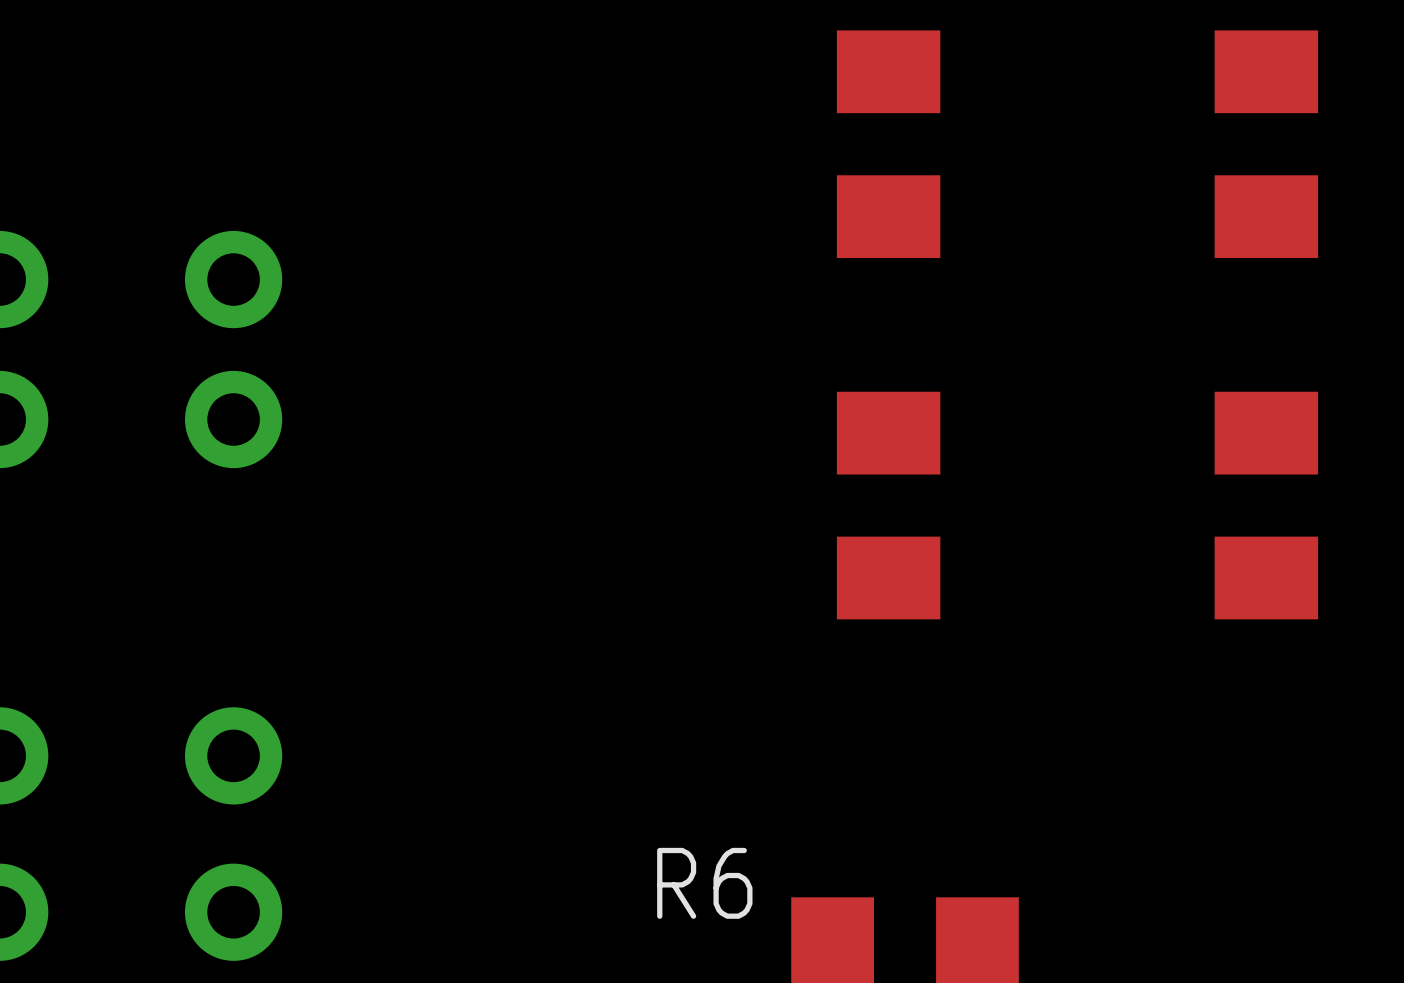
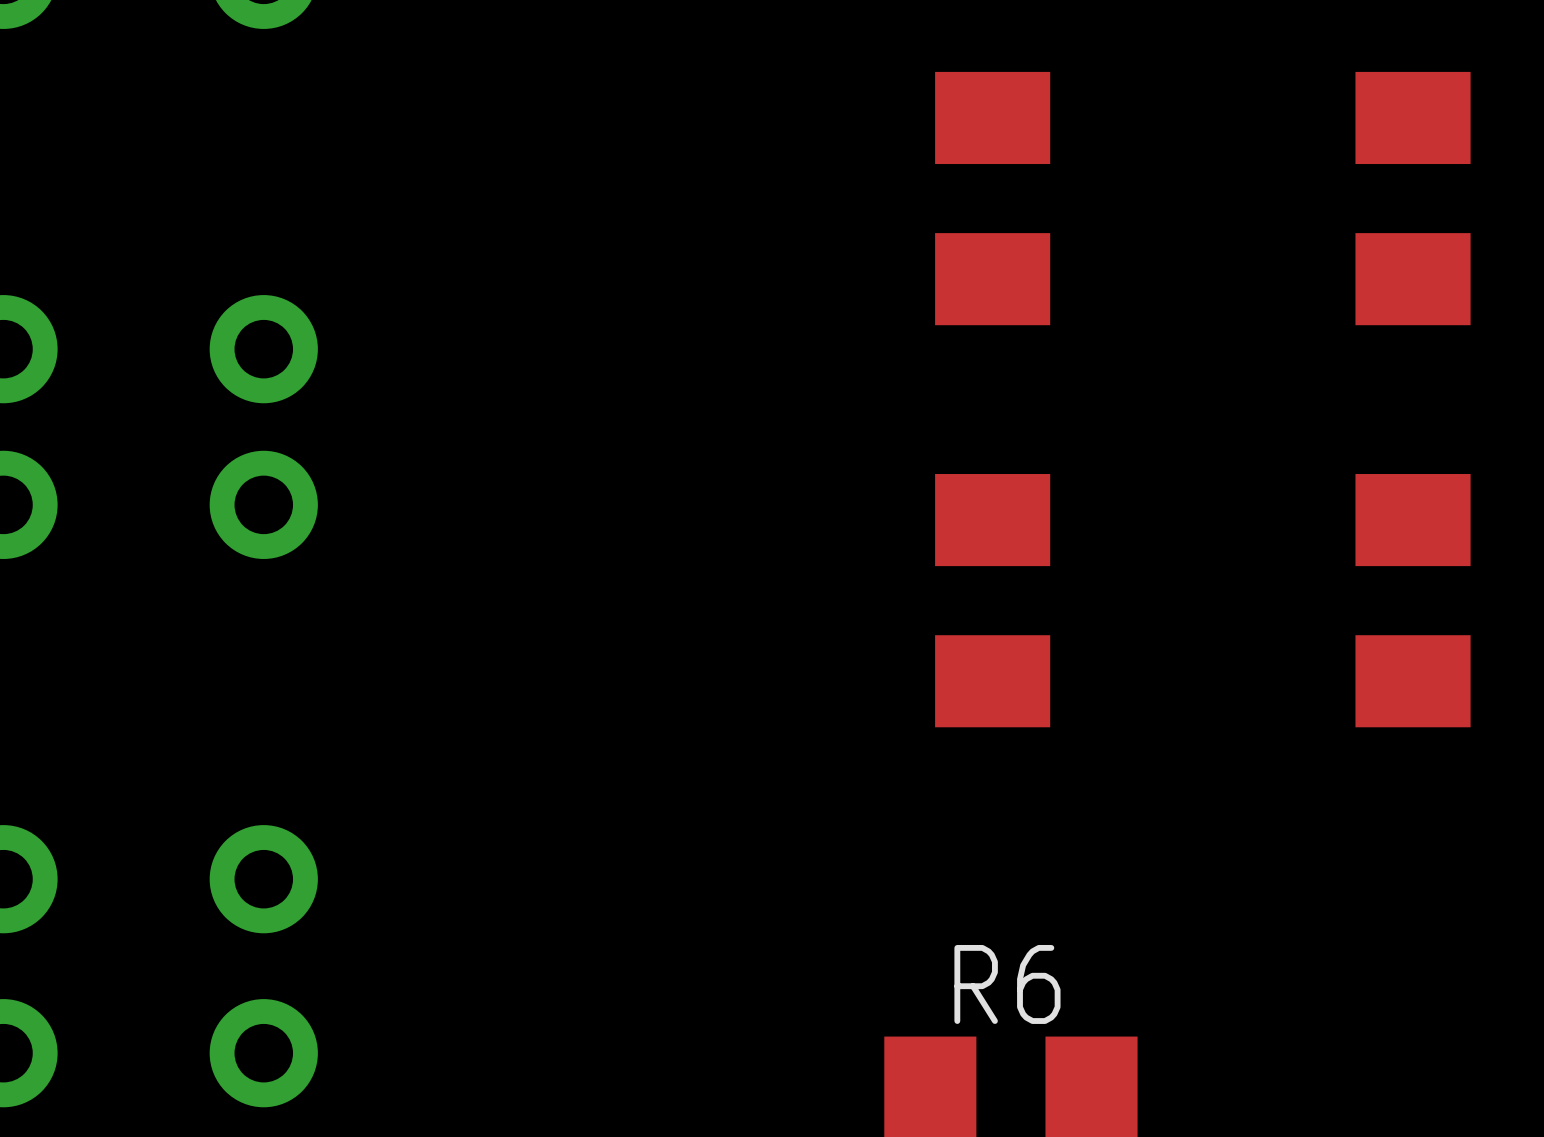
R6 name position: R6 (704, 883) -> R6 (1007, 984)

